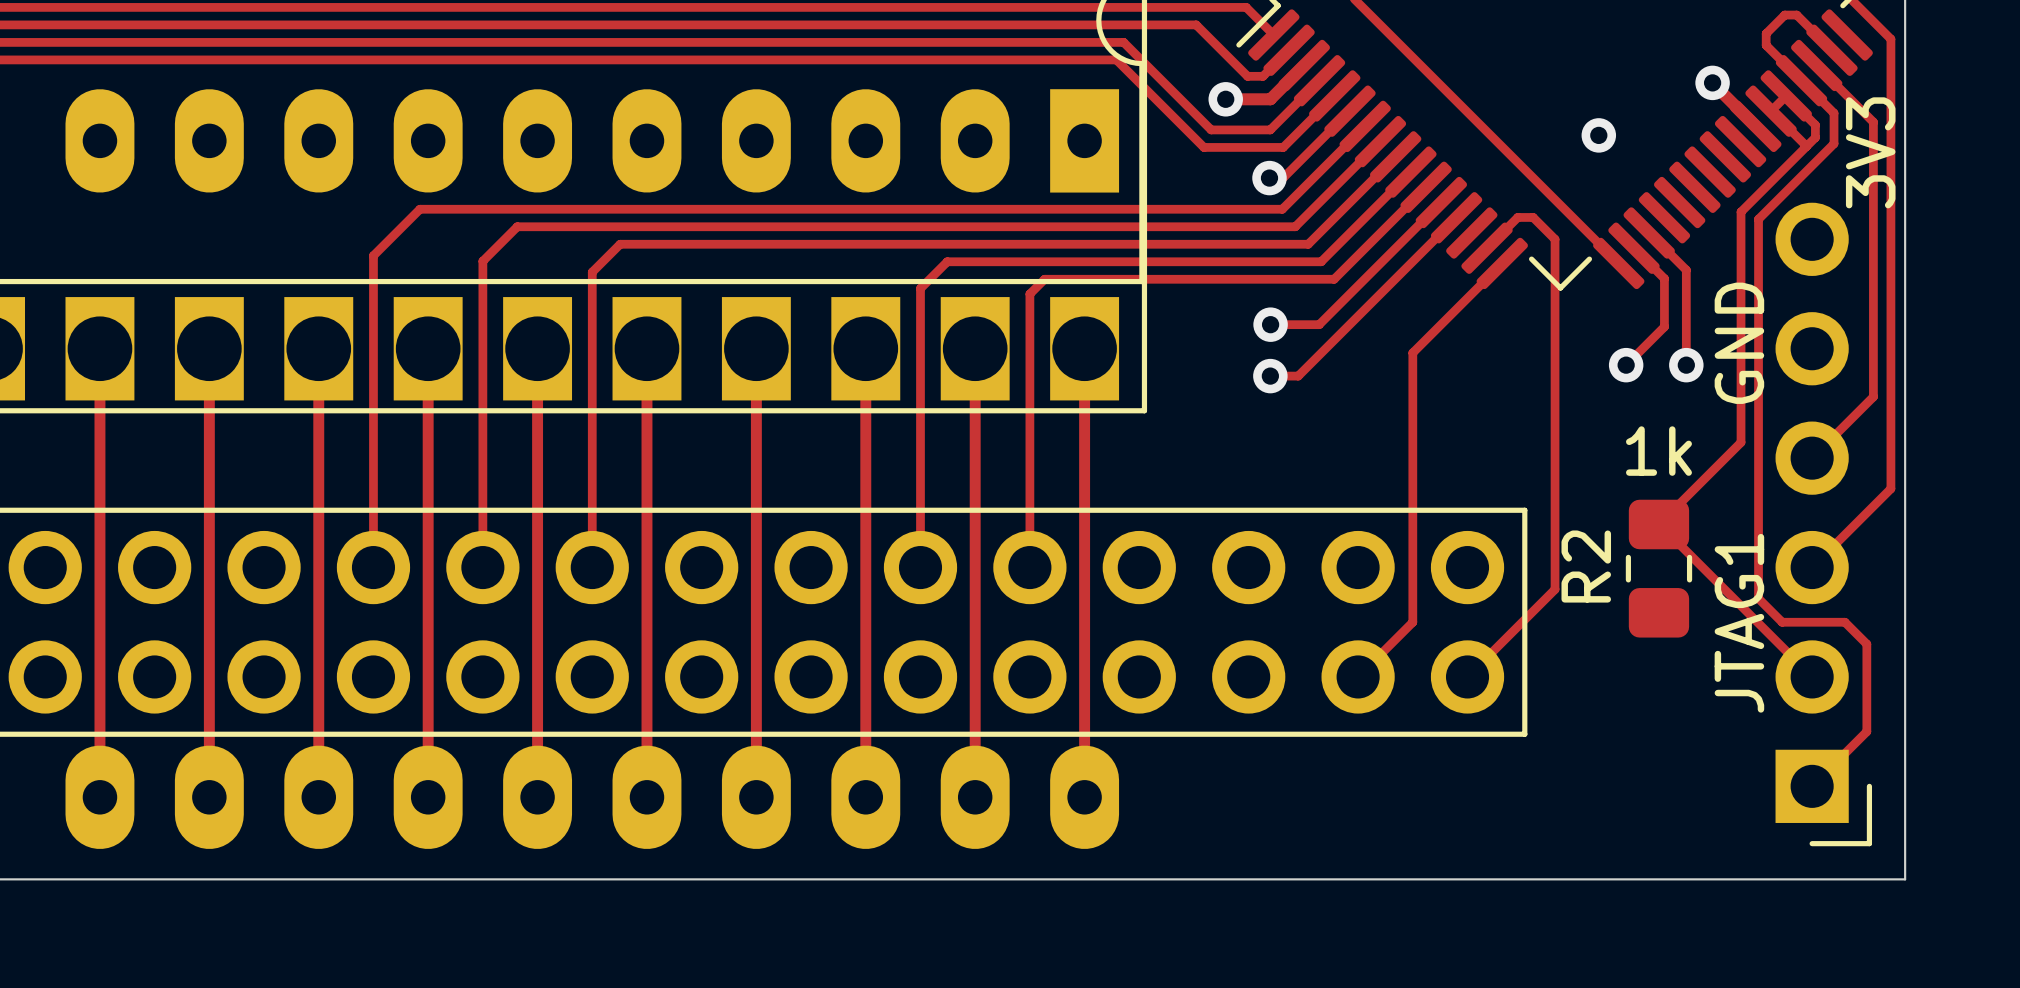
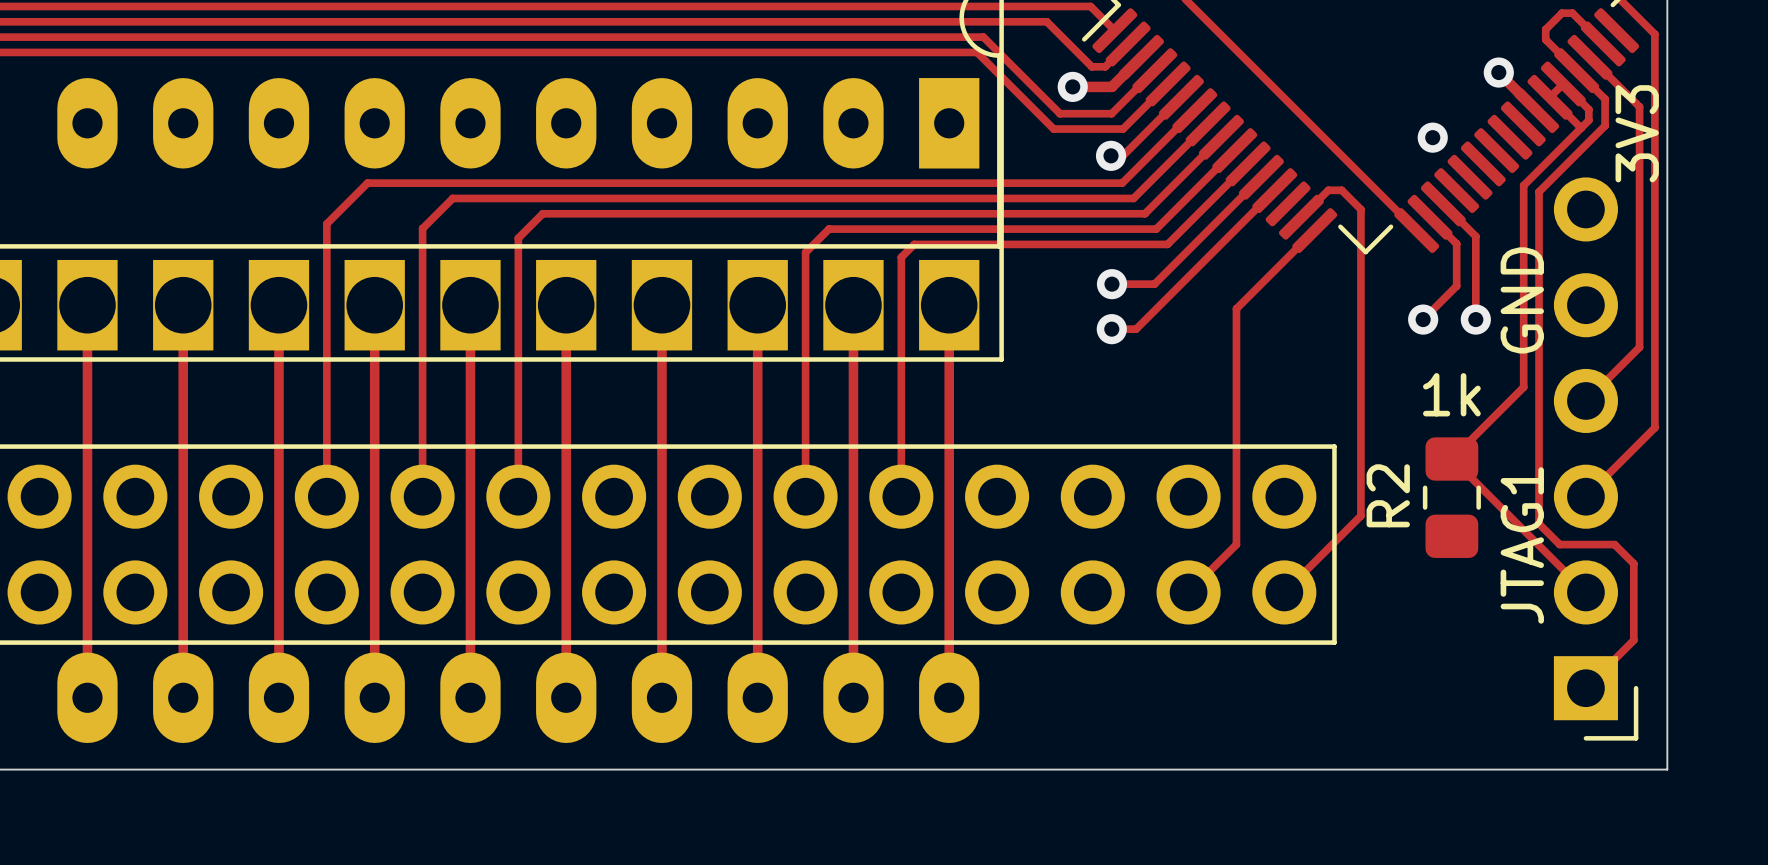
via position: (1598, 135) -> (1432, 137)

